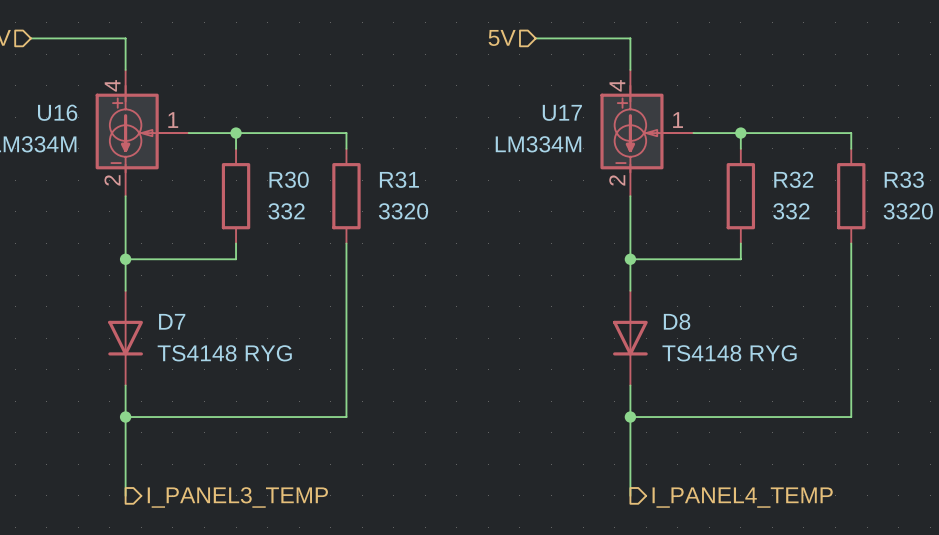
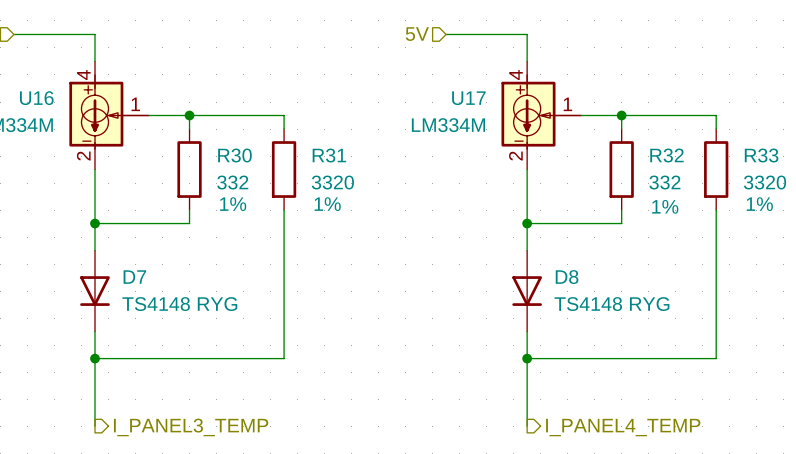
R30 text: none -> 1% (233, 204)
R31 text: none -> 1% (327, 204)
R33 text: none -> 1% (759, 204)
R32 text: none -> 1% (665, 206)

